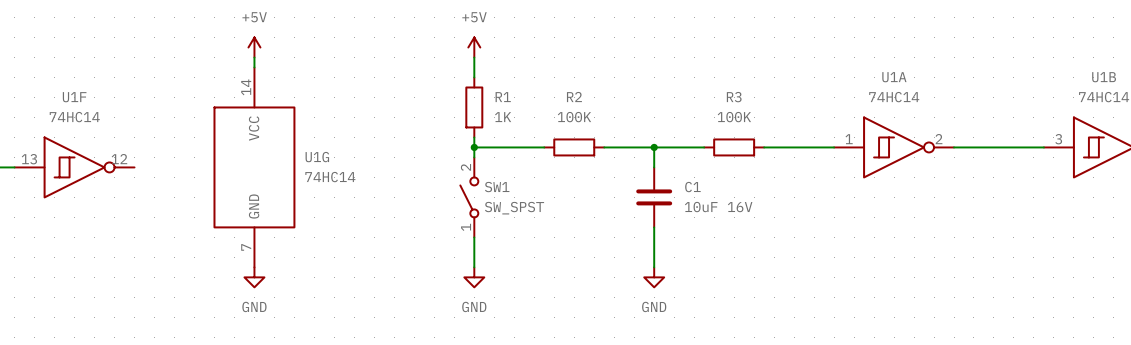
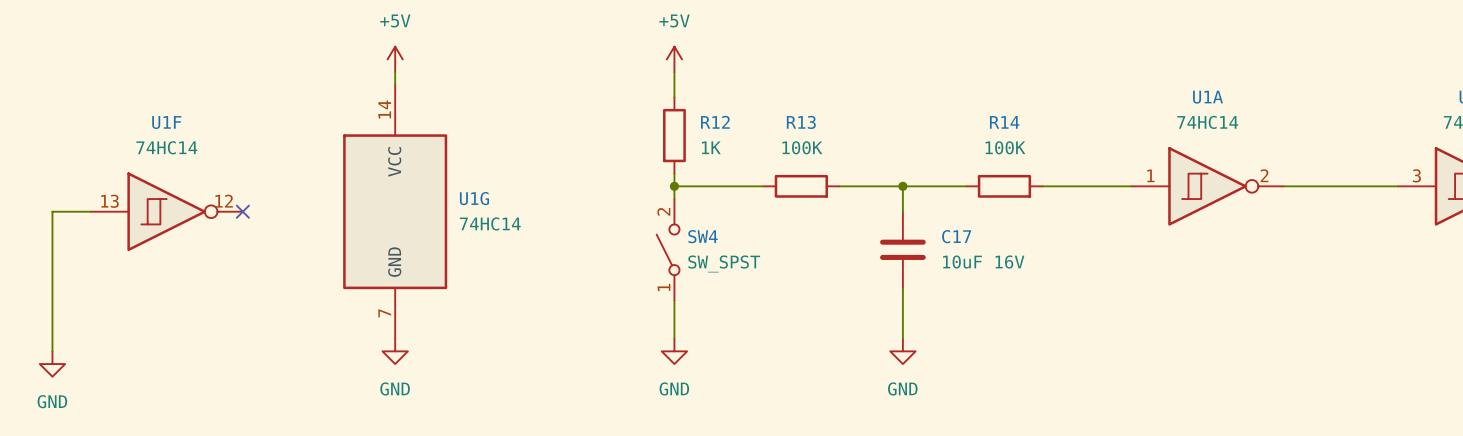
R1 name: R1 (503, 97) -> R12 (715, 122)
R2 name: R2 (574, 97) -> R13 (801, 122)
R3 name: R3 (734, 97) -> R14 (1004, 122)
no-connect mark: none -> (242, 211)
SW1 name: SW1 (497, 187) -> SW4 (703, 236)
C1 name: C1 (692, 187) -> C17 (956, 236)

